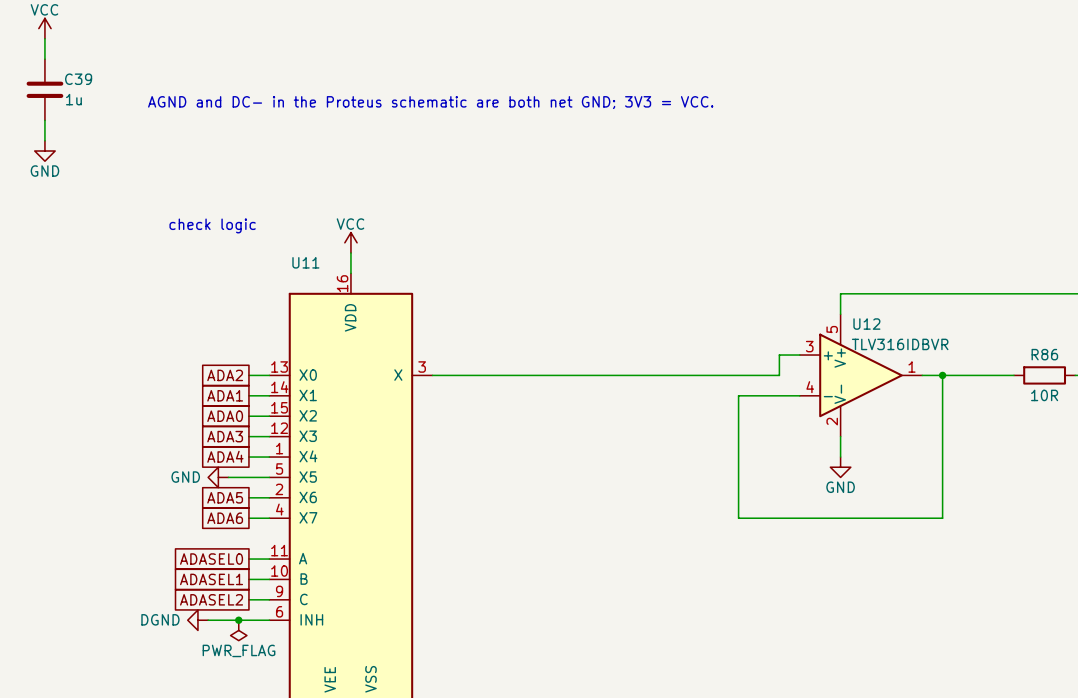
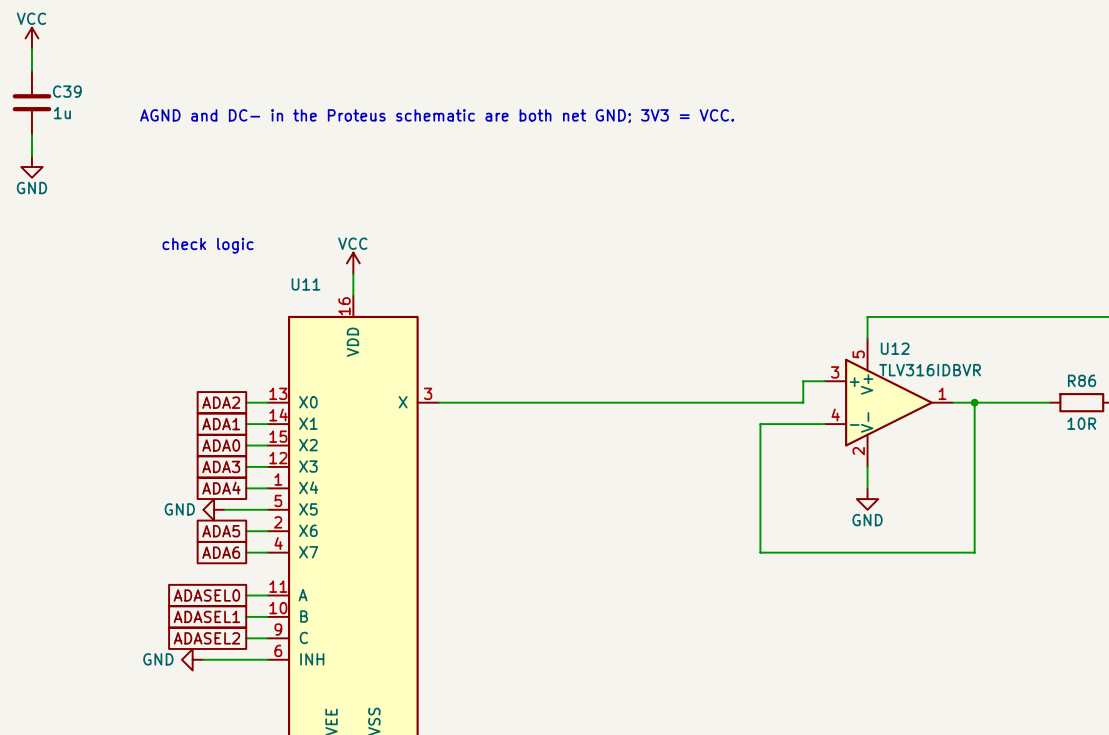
power symbol: DGND (197, 620) -> GND (192, 659)
junction: (238, 620) -> none
power symbol: PWR_FLAG (238, 630) -> none

